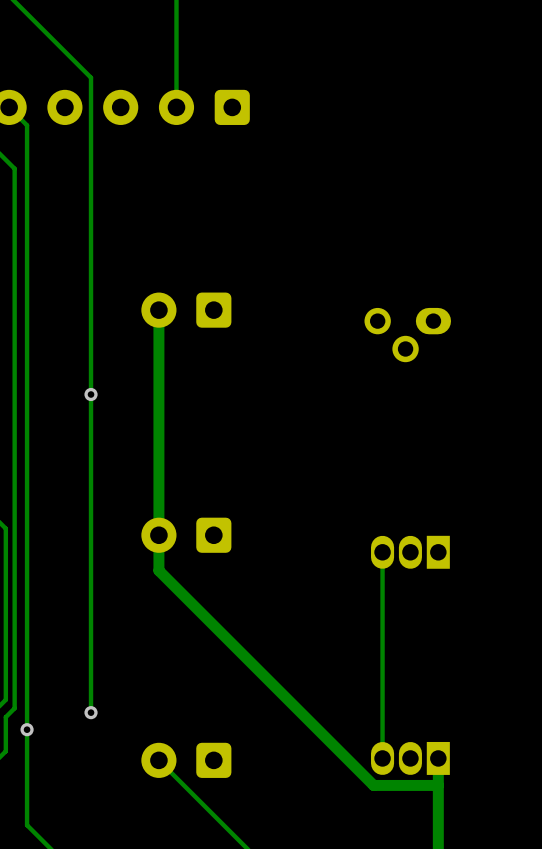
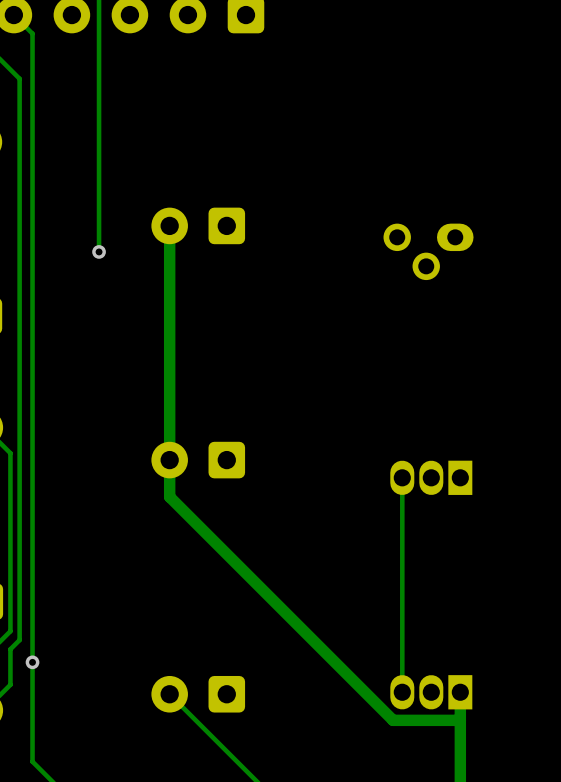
track: (91, 335) (91, 712) -> none
via position: (91, 394) -> (99, 251)
via: (91, 712) -> none

